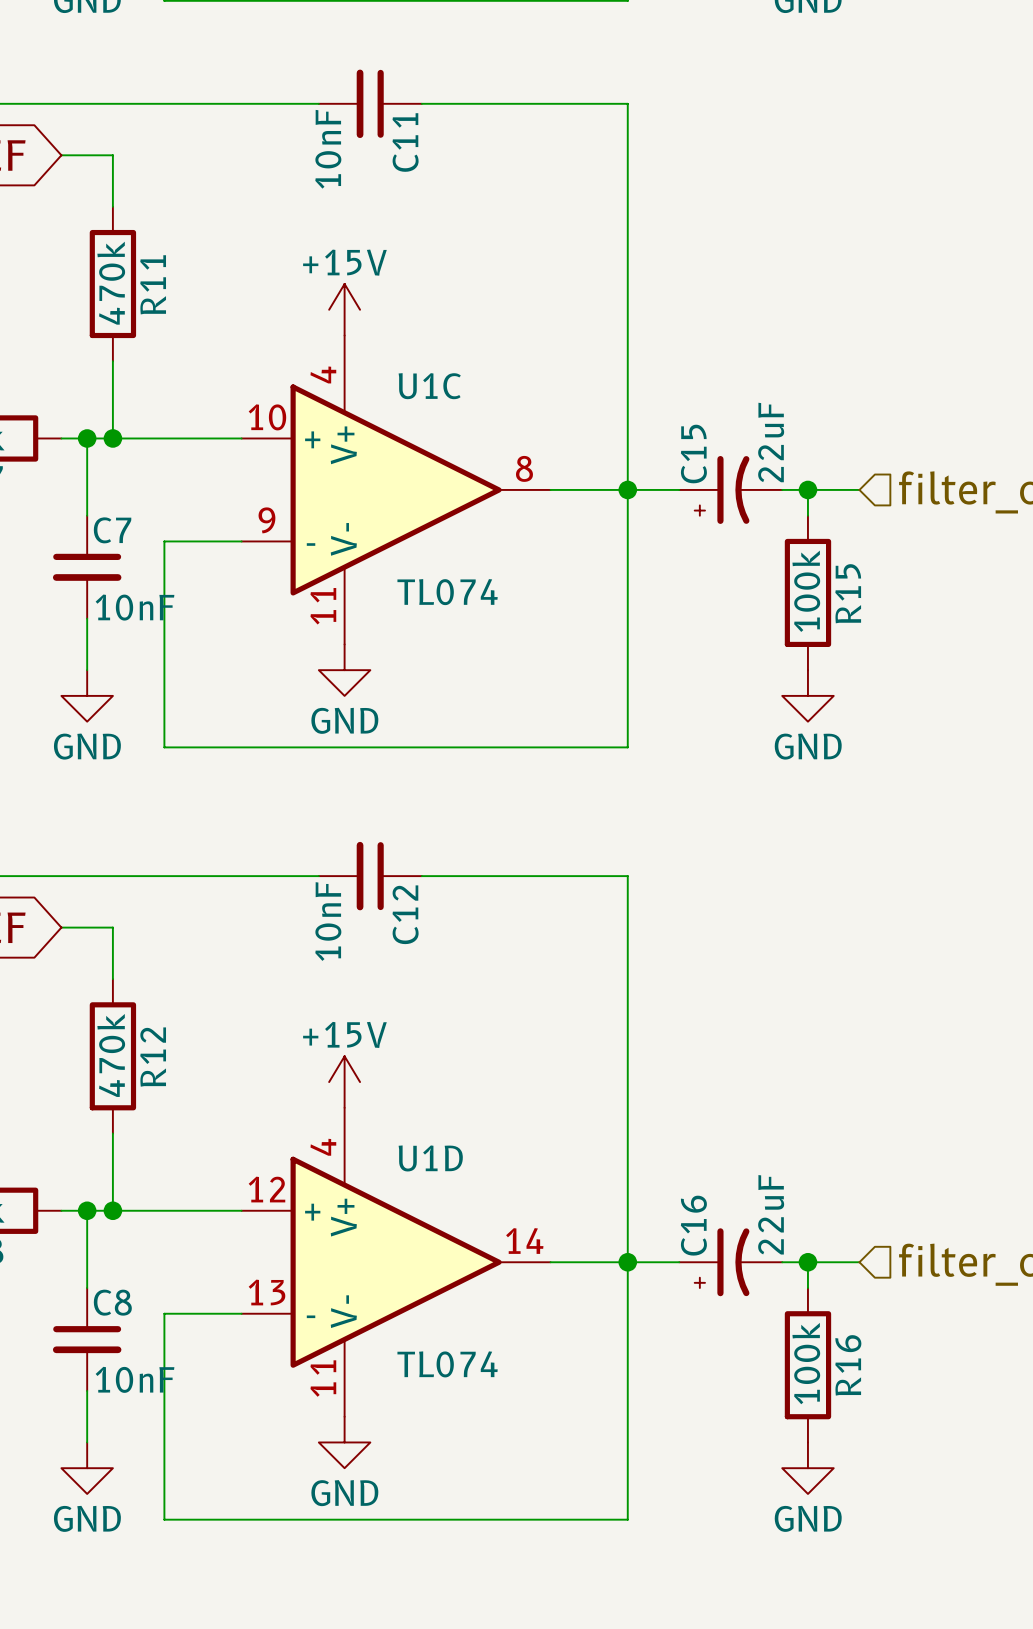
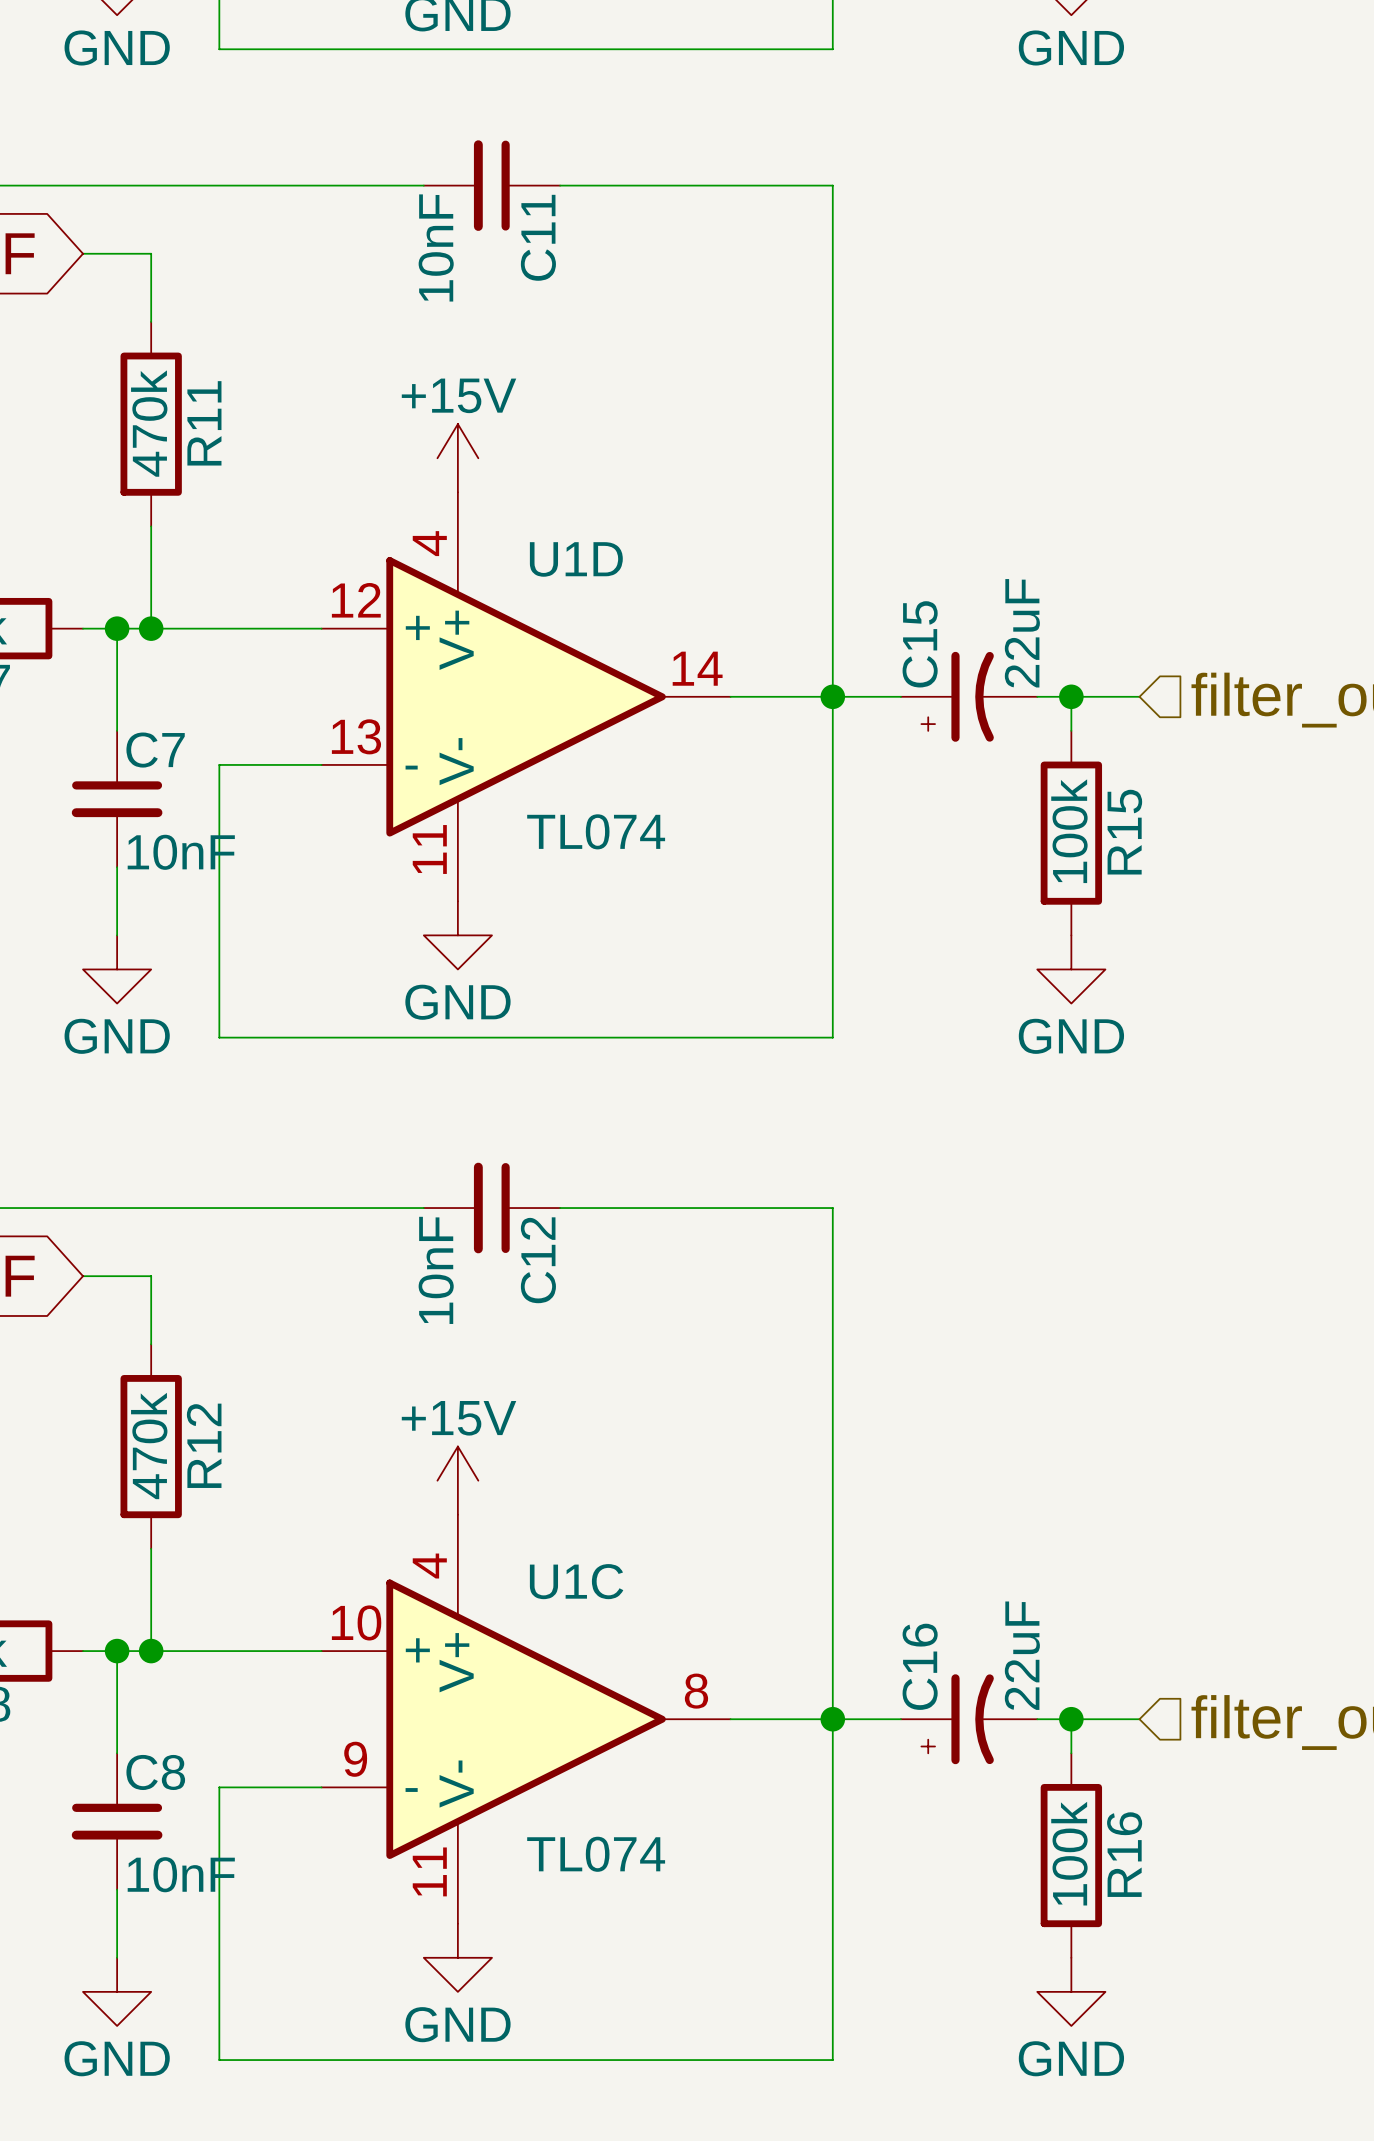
U1C position: (396, 489) -> (526, 1719)
U1D position: (396, 1262) -> (526, 696)

